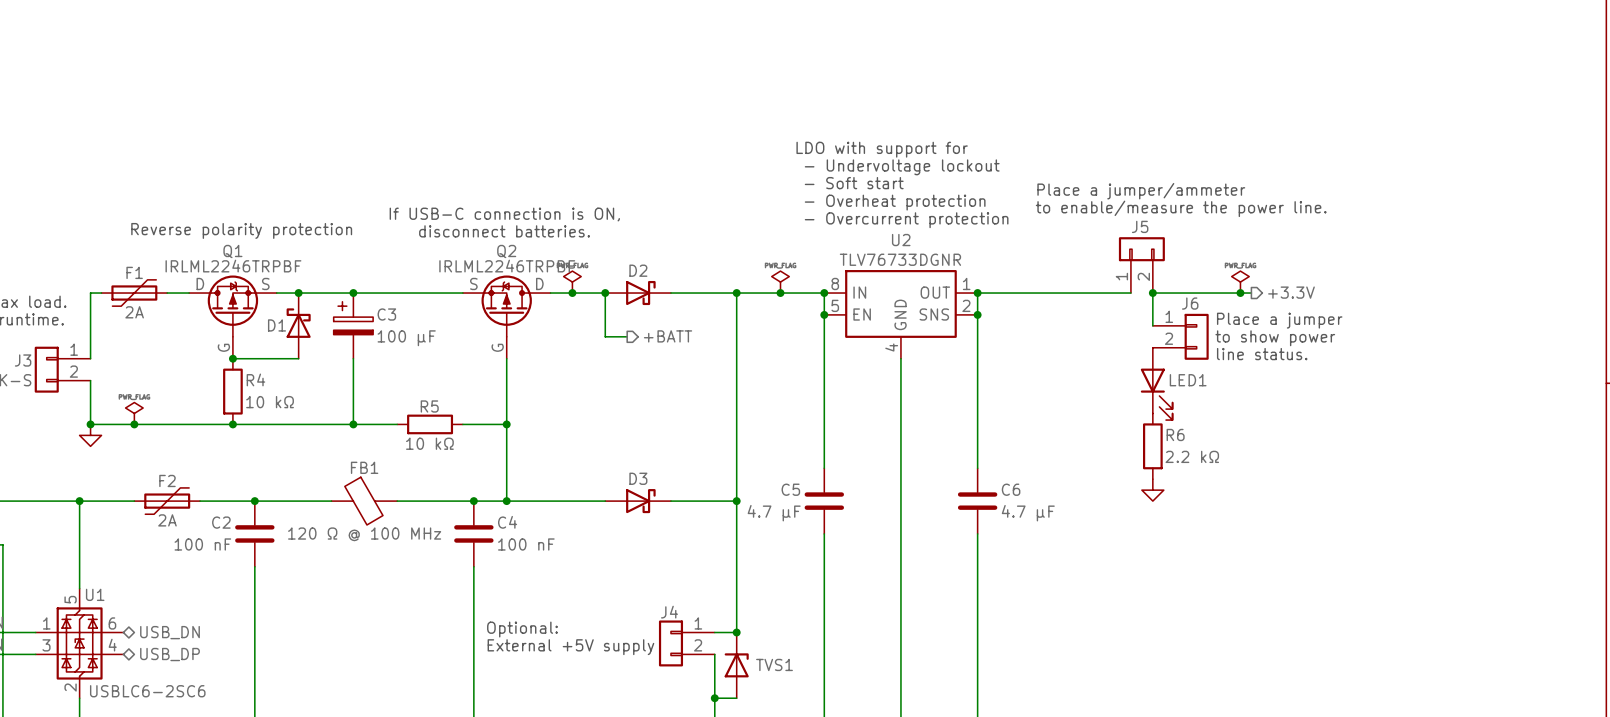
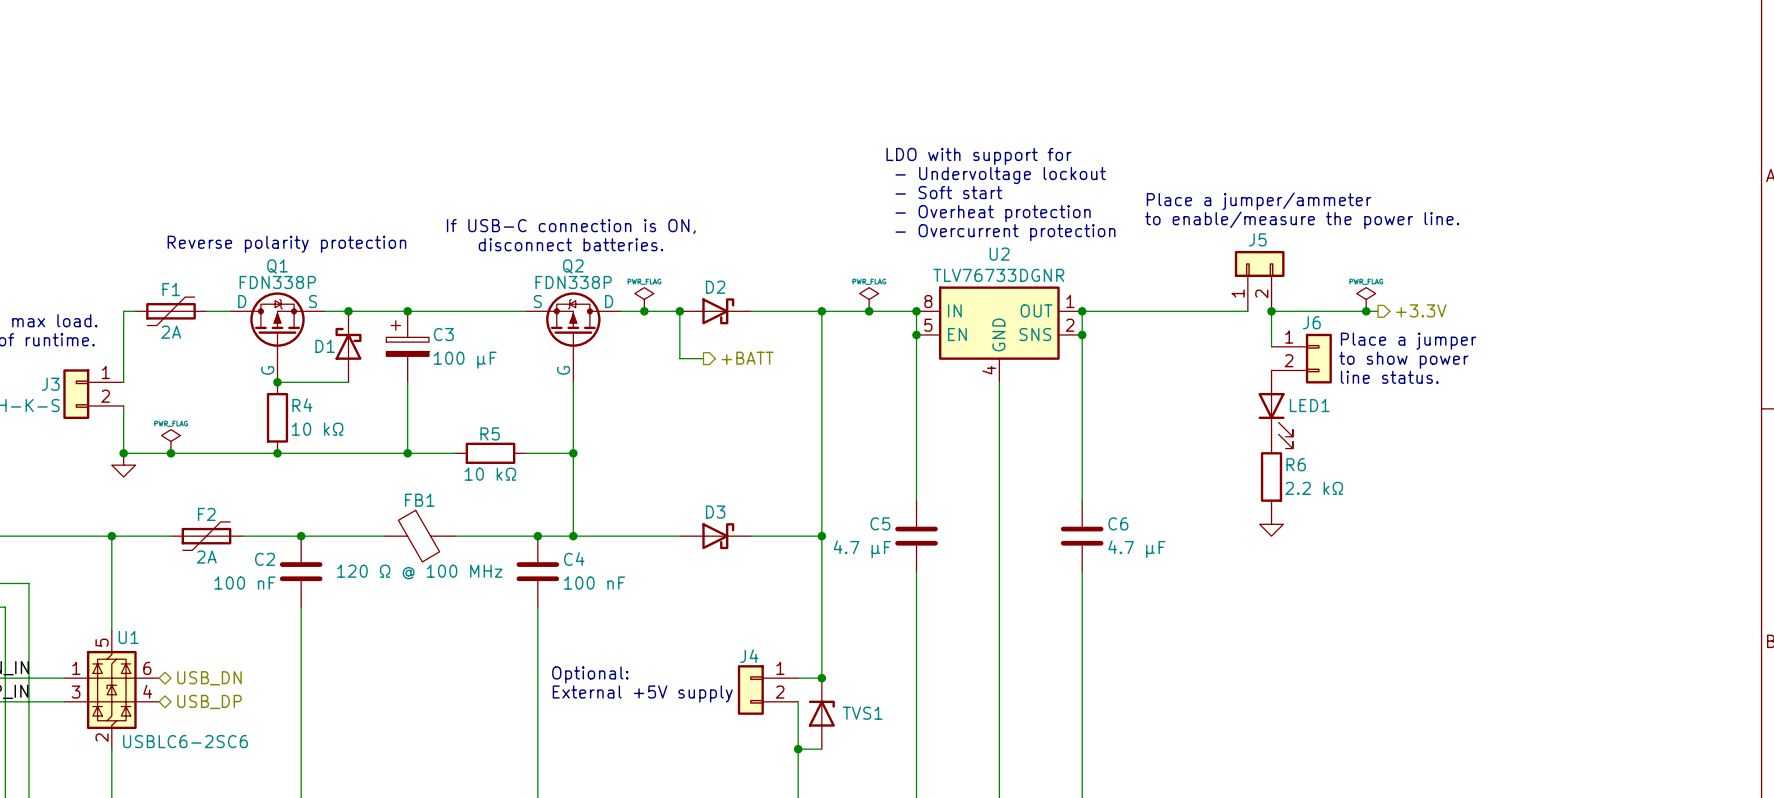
Q1 value: IRLML2246TRPBF (233, 266) -> FDN338P (277, 282)
Q2 value: IRLML2246TRPBF (507, 266) -> FDN338P (573, 282)

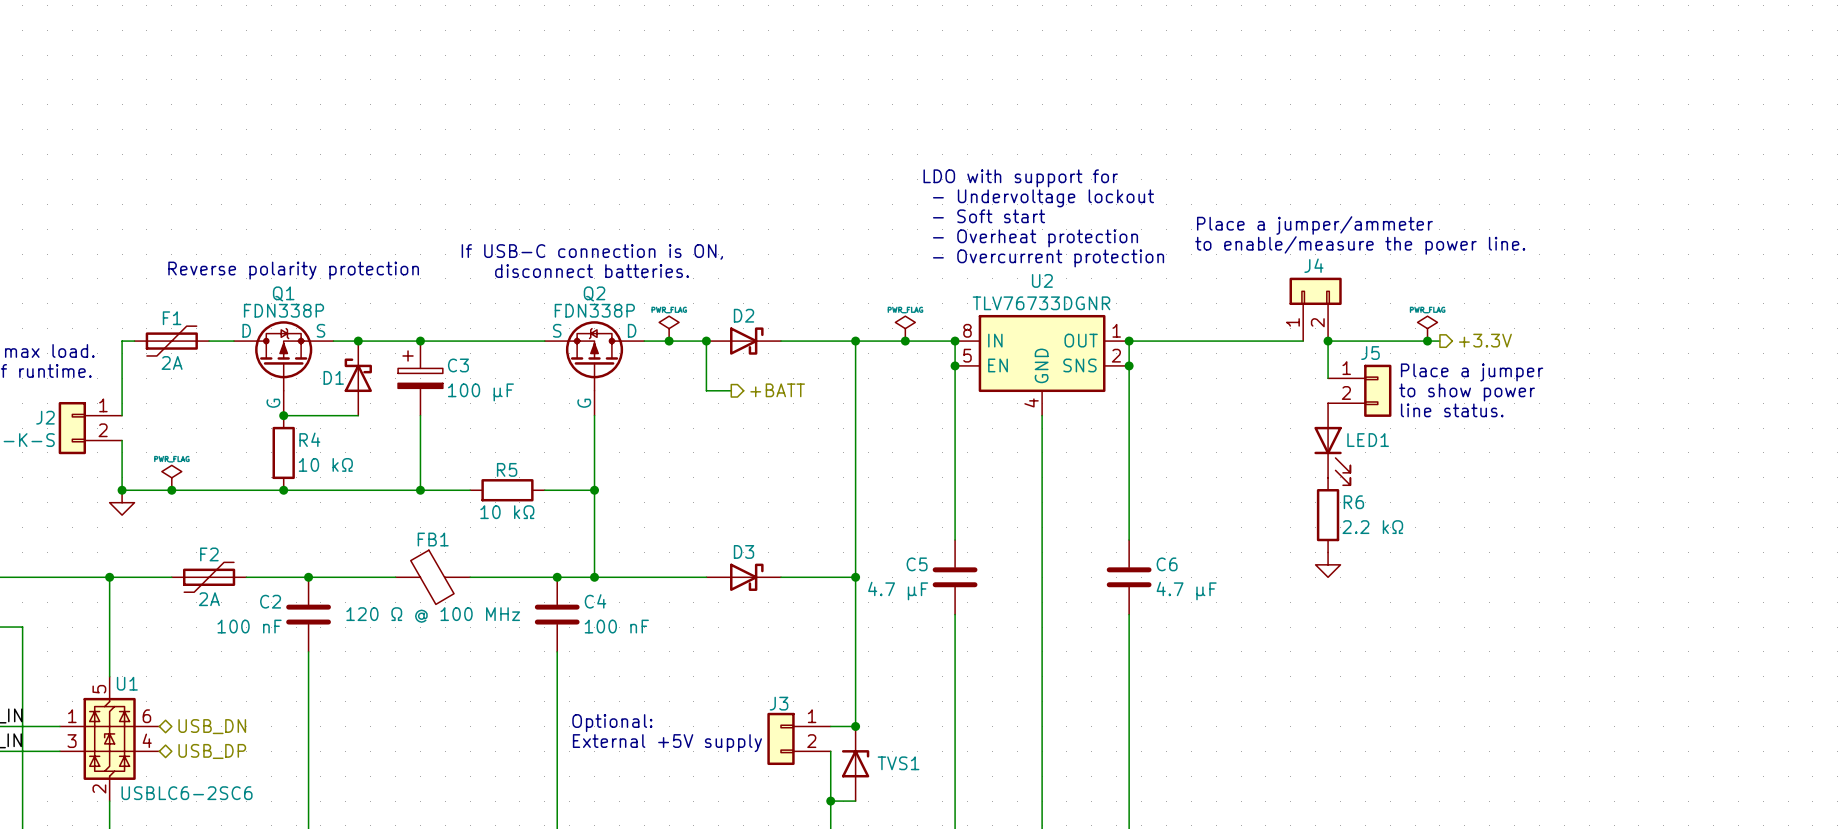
J5 name: J5 (1257, 239) -> J4 (1313, 265)
J6 name: J6 (1311, 322) -> J5 (1370, 353)
J3 name: J3 (50, 384) -> J2 (45, 417)
J4 name: J4 (749, 656) -> J3 (779, 703)

